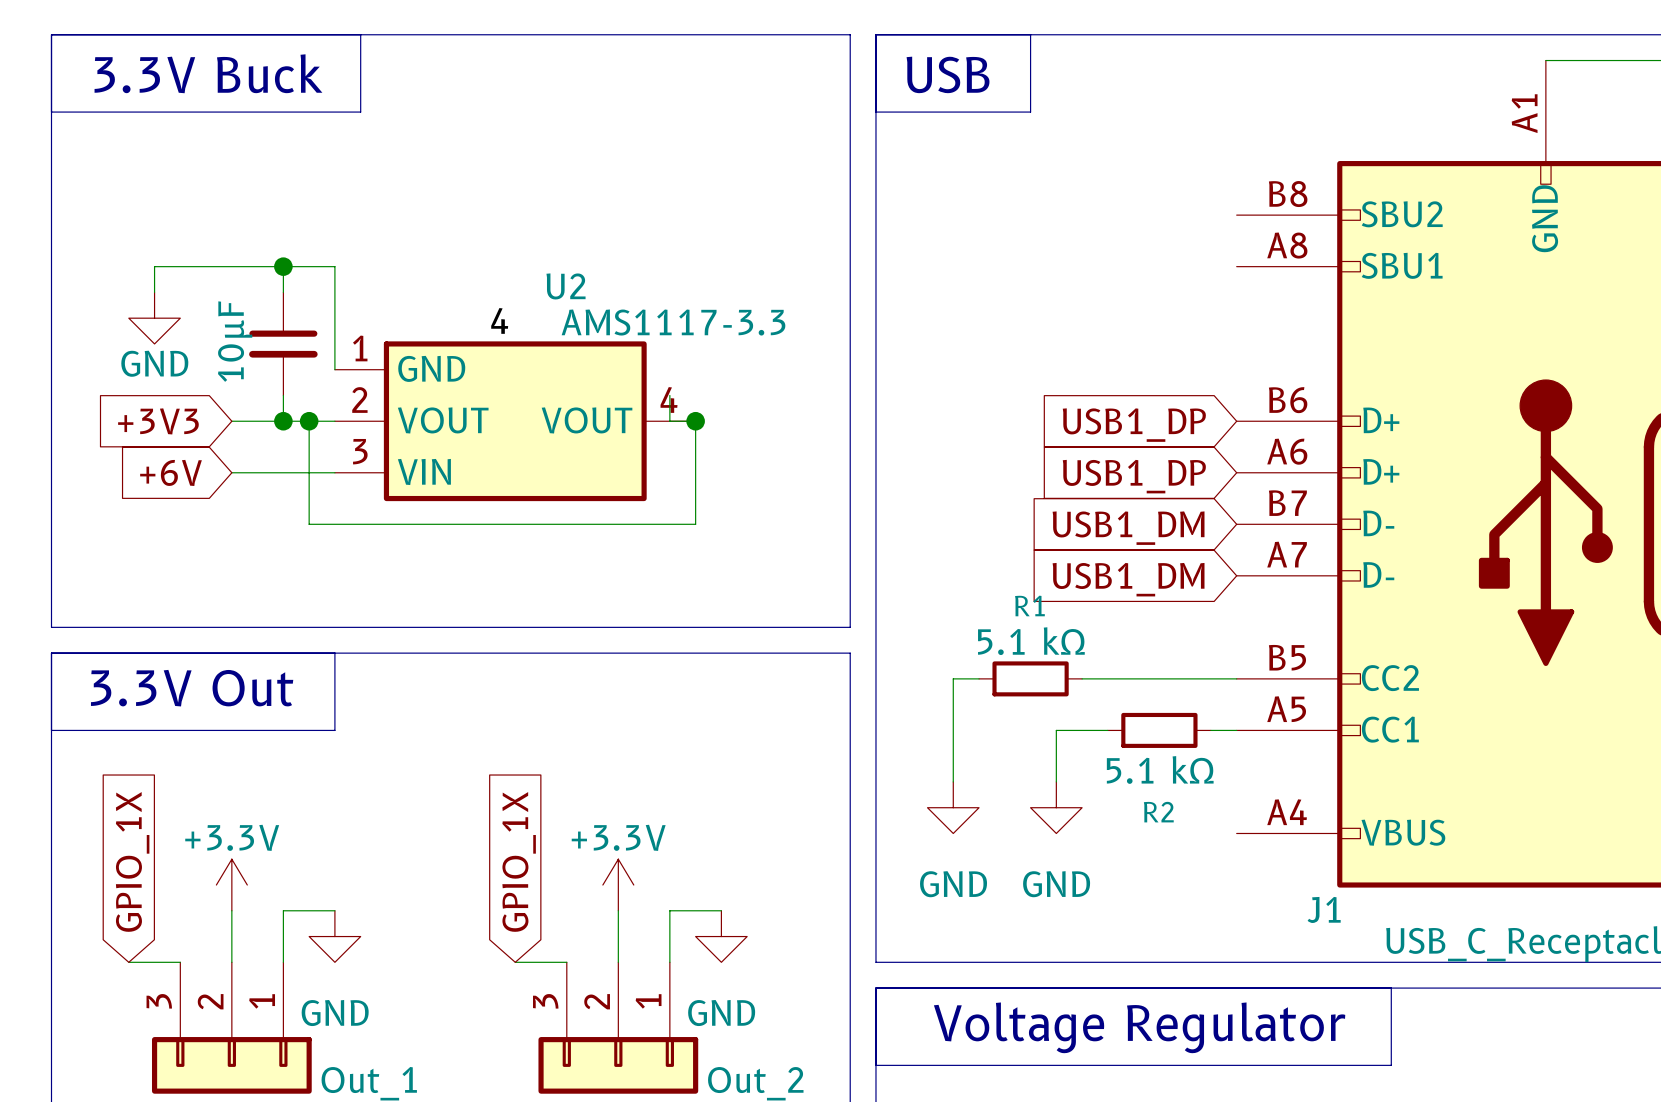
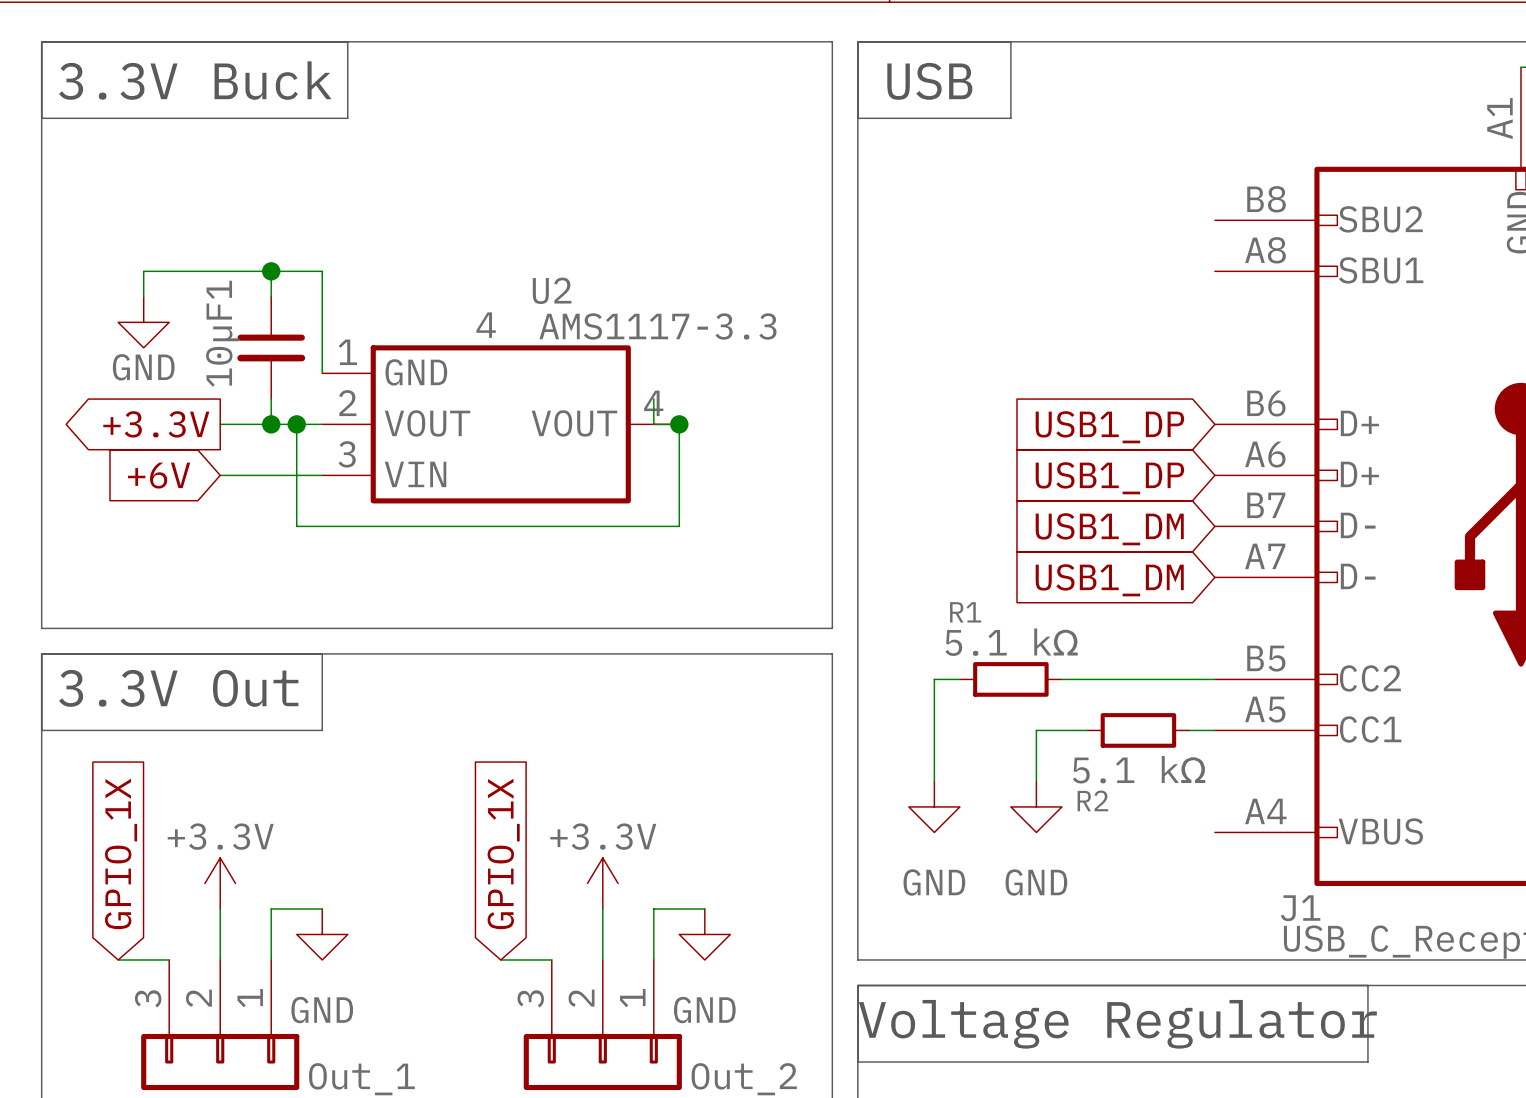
10µF name: 10µF (235, 341) -> 10µF1 (222, 333)
global label shape: input (158, 421) -> output (156, 424)
global label: +3V3 (158, 421) -> +3.3V (156, 424)
R1 name position: R1 (1029, 605) -> R1 (965, 612)
R2 name position: R2 (1158, 812) -> R2 (1092, 800)

